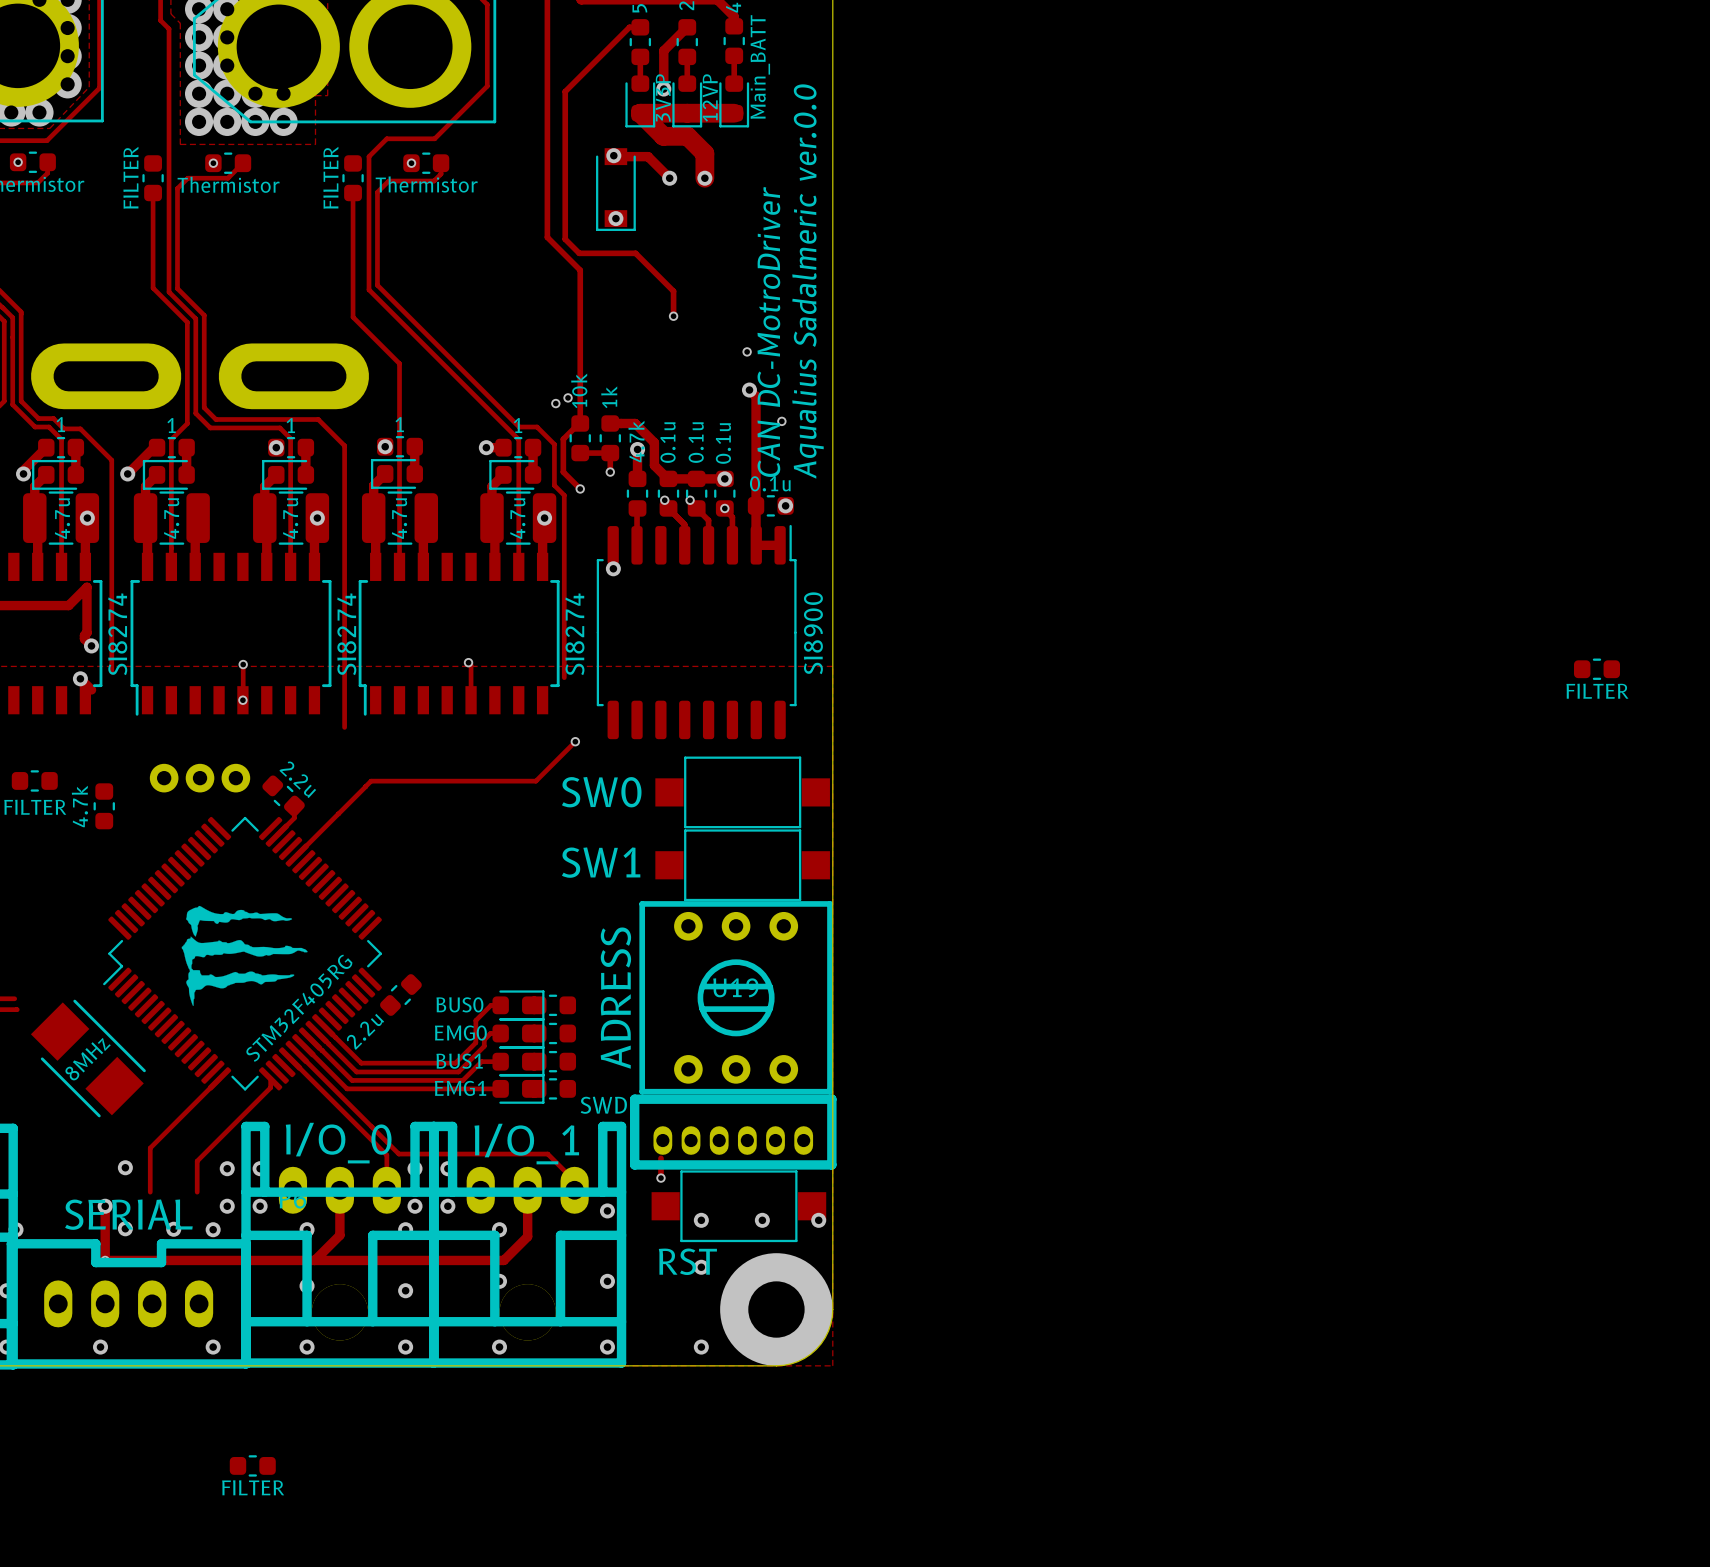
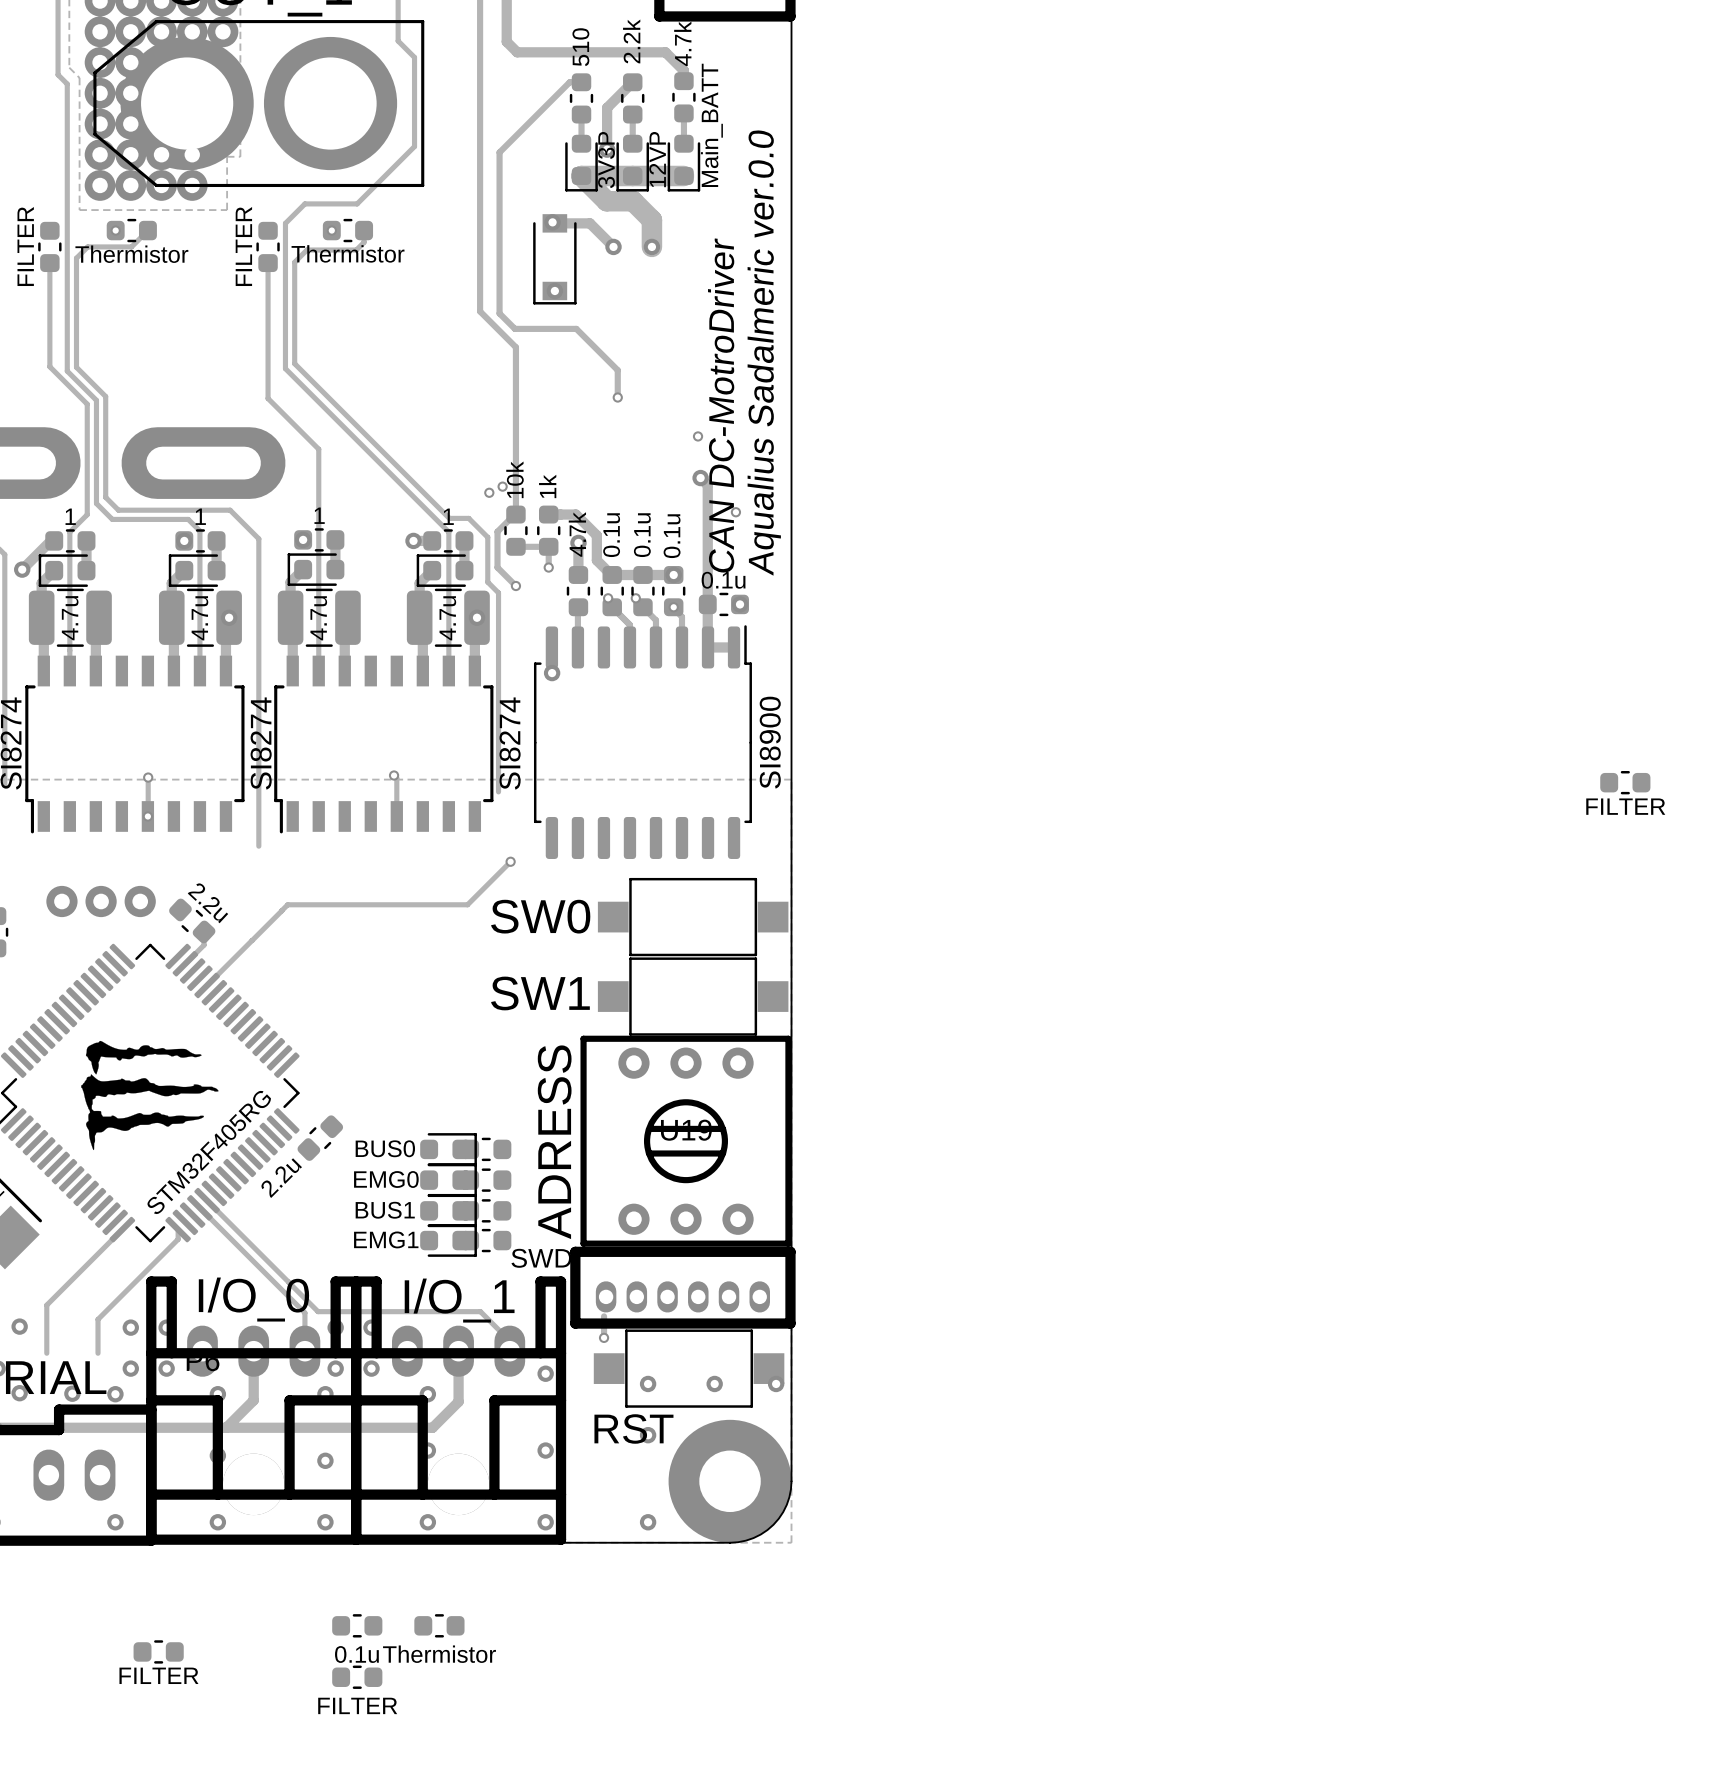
track: (500, 1005) (491, 1005) (475, 1020) (475, 1042) (455, 1063) (361, 1063) (323, 1025) -> none
track: (317, 1032) (356, 1071) (458, 1071) (484, 1046) (484, 1039) (490, 1033) (500, 1033) -> none
track: (303, 1045) (347, 1088) (500, 1088) -> none
track: (322, 1050) (352, 1080) (462, 1080) (481, 1061) (500, 1061) -> none
part: none -> 0.1u (357, 1625)
part: none -> Thermistor (439, 1625)
part: none -> FILTER (357, 1677)

